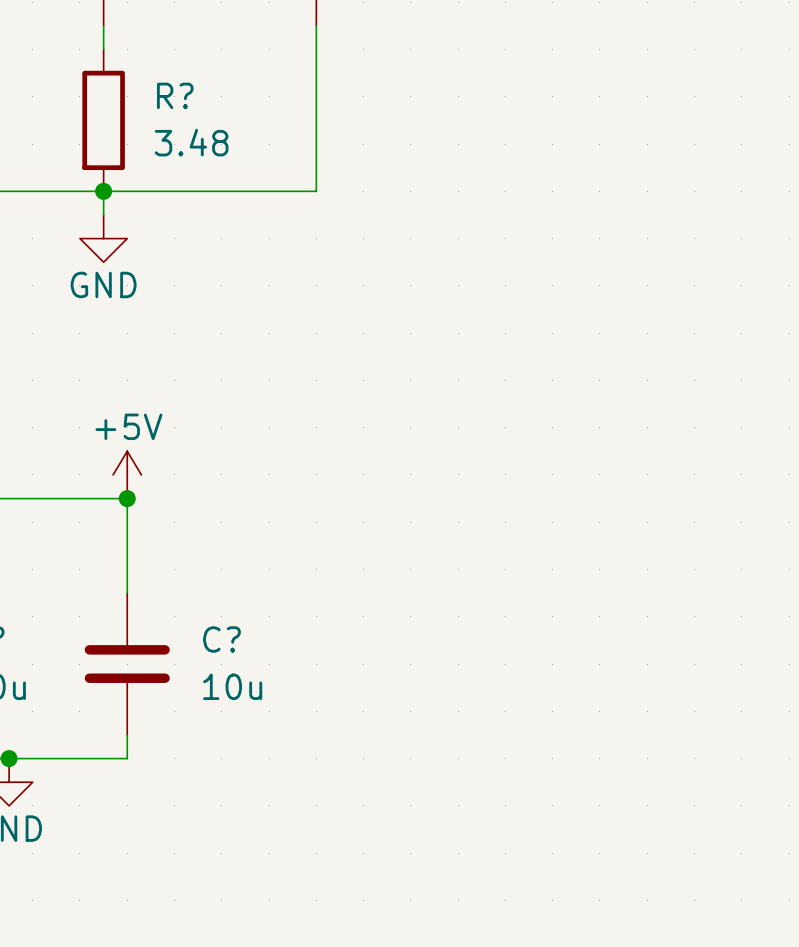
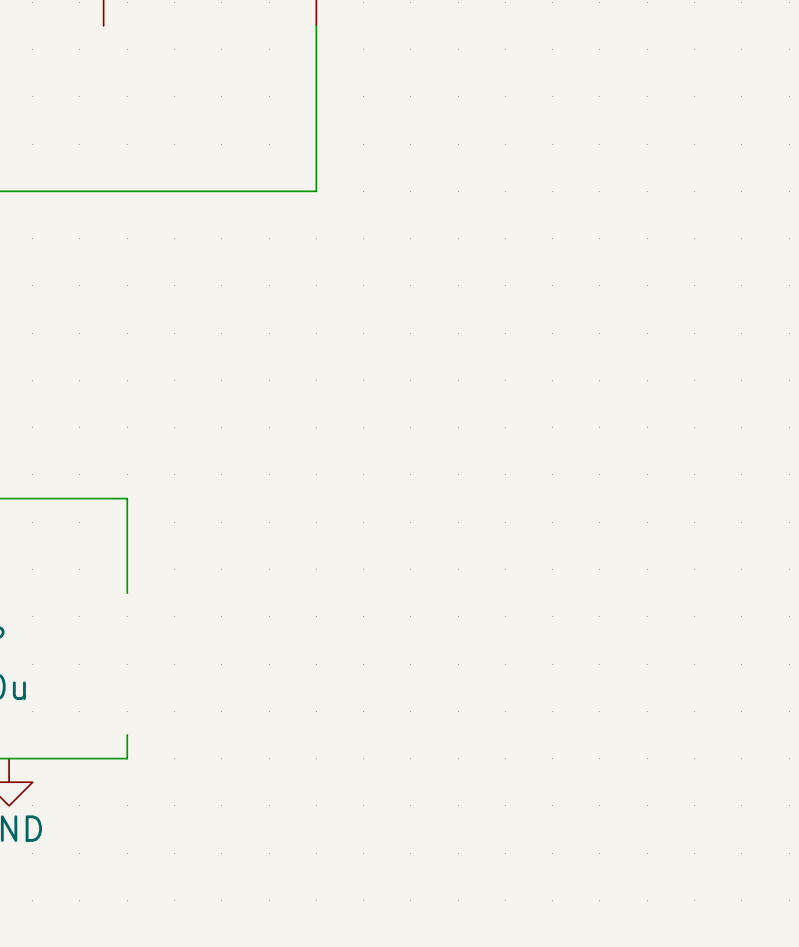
wire: (103, 25) (103, 49) -> none
R?: 3.48 (103, 120) -> none
wire: (103, 191) (103, 214) -> none
junction: (103, 191) -> none
power symbol: GND (103, 238) -> none
power symbol: +5V (127, 474) -> none
junction: (127, 498) -> none
C?: 10u (127, 664) -> none
junction: (9, 758) -> none

